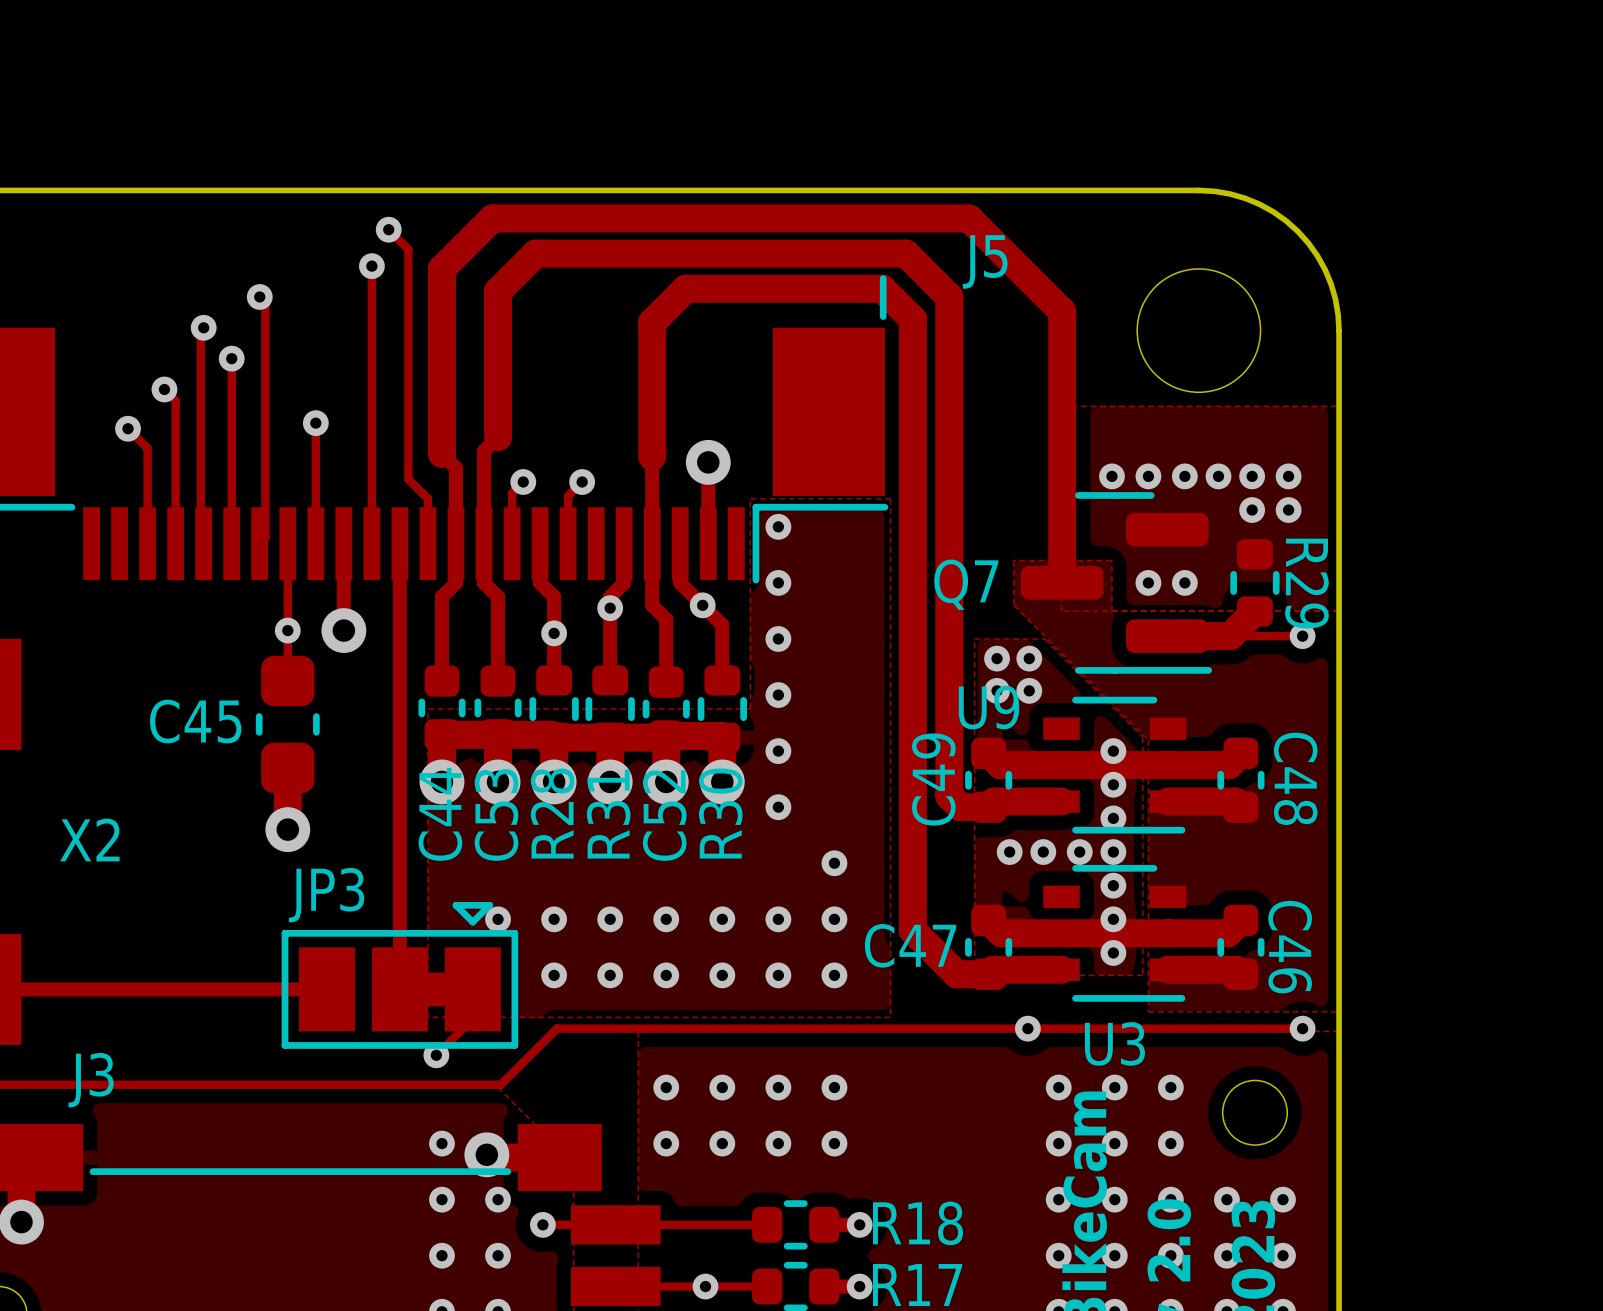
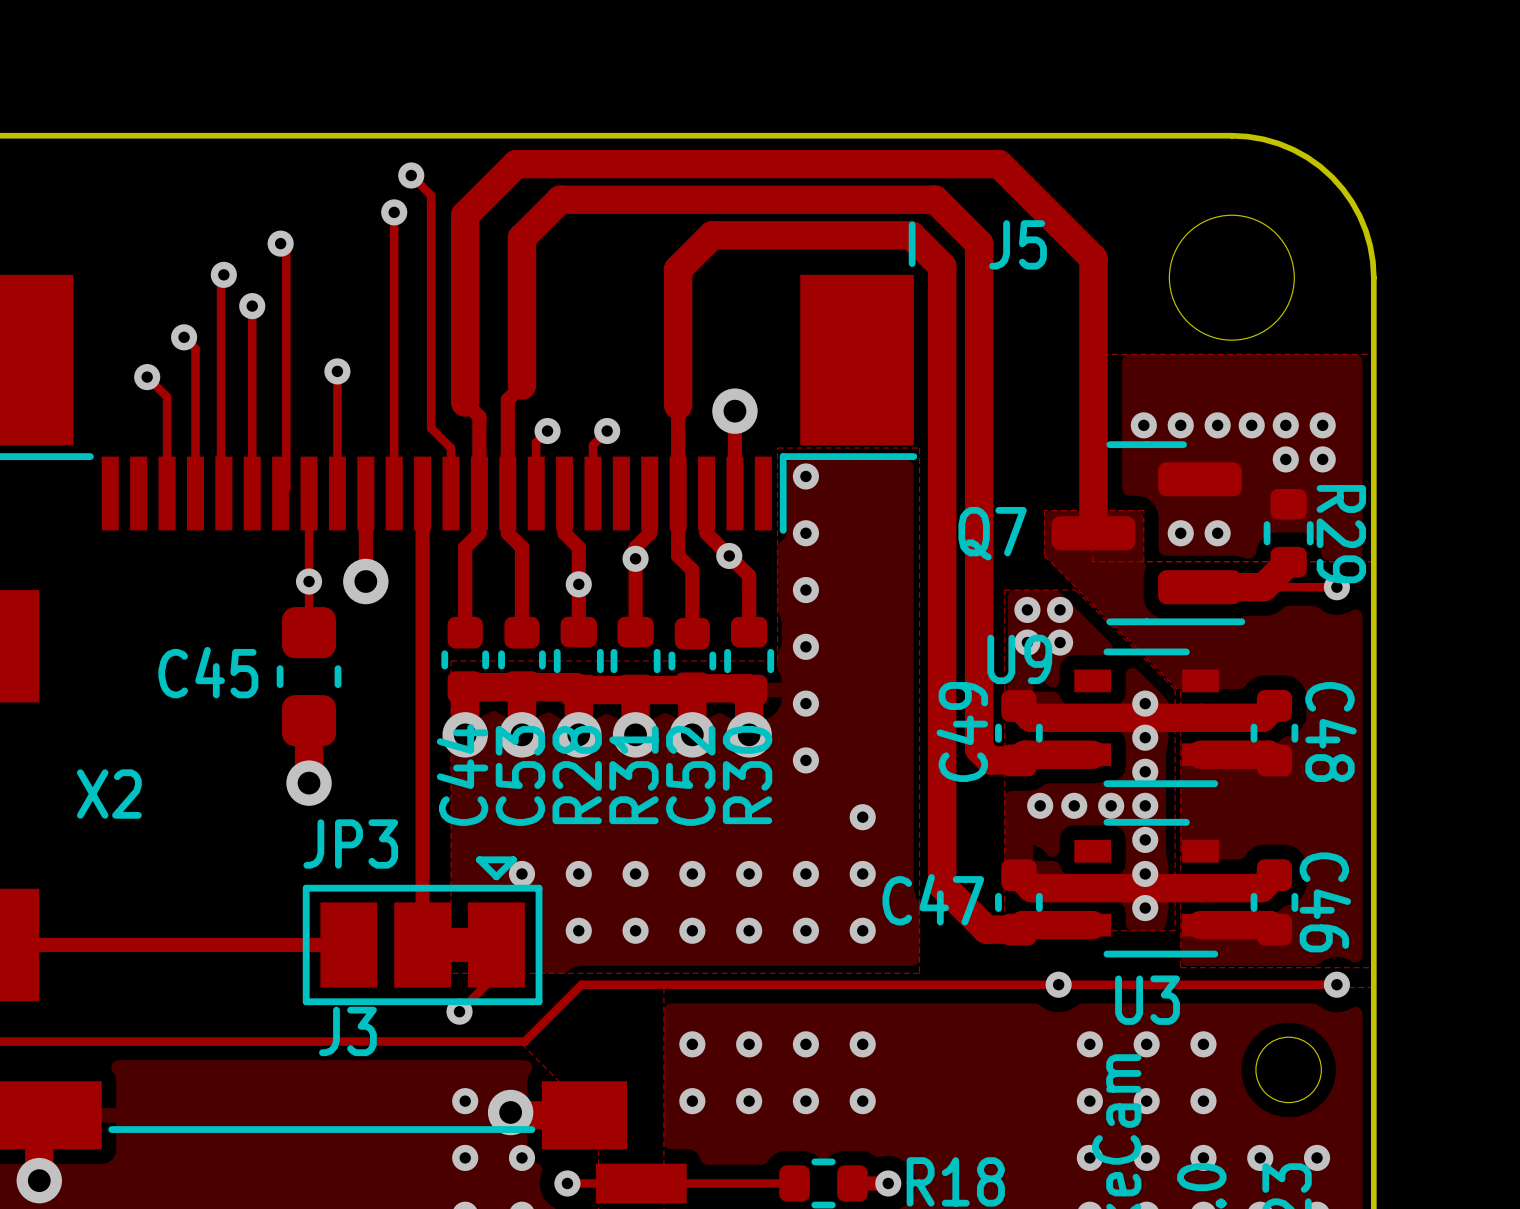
J5 name position: J5 (985, 261) -> J5 (1018, 244)
J3 name position: J3 (91, 1080) -> J3 (347, 1031)

